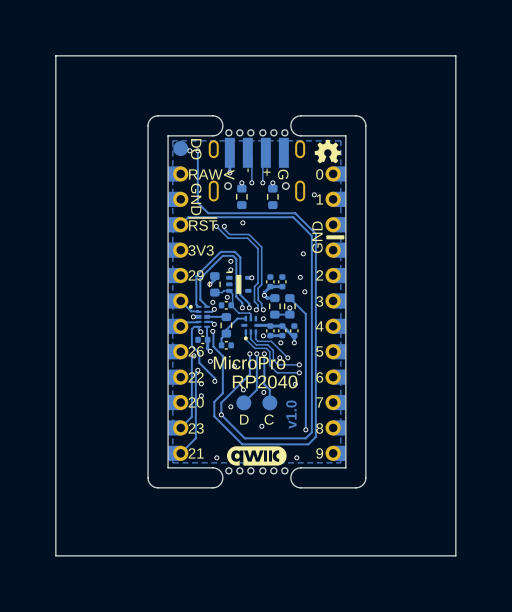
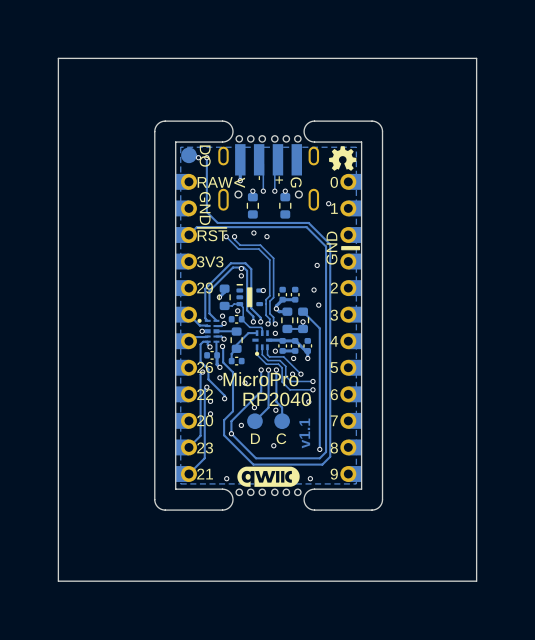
via: none -> (266, 236)
via: none -> (241, 268)
via: (230, 261) -> none
via: none -> (241, 275)
via: (230, 269) -> none
text: v1.0 (291, 414) -> v1.1 (304, 433)

